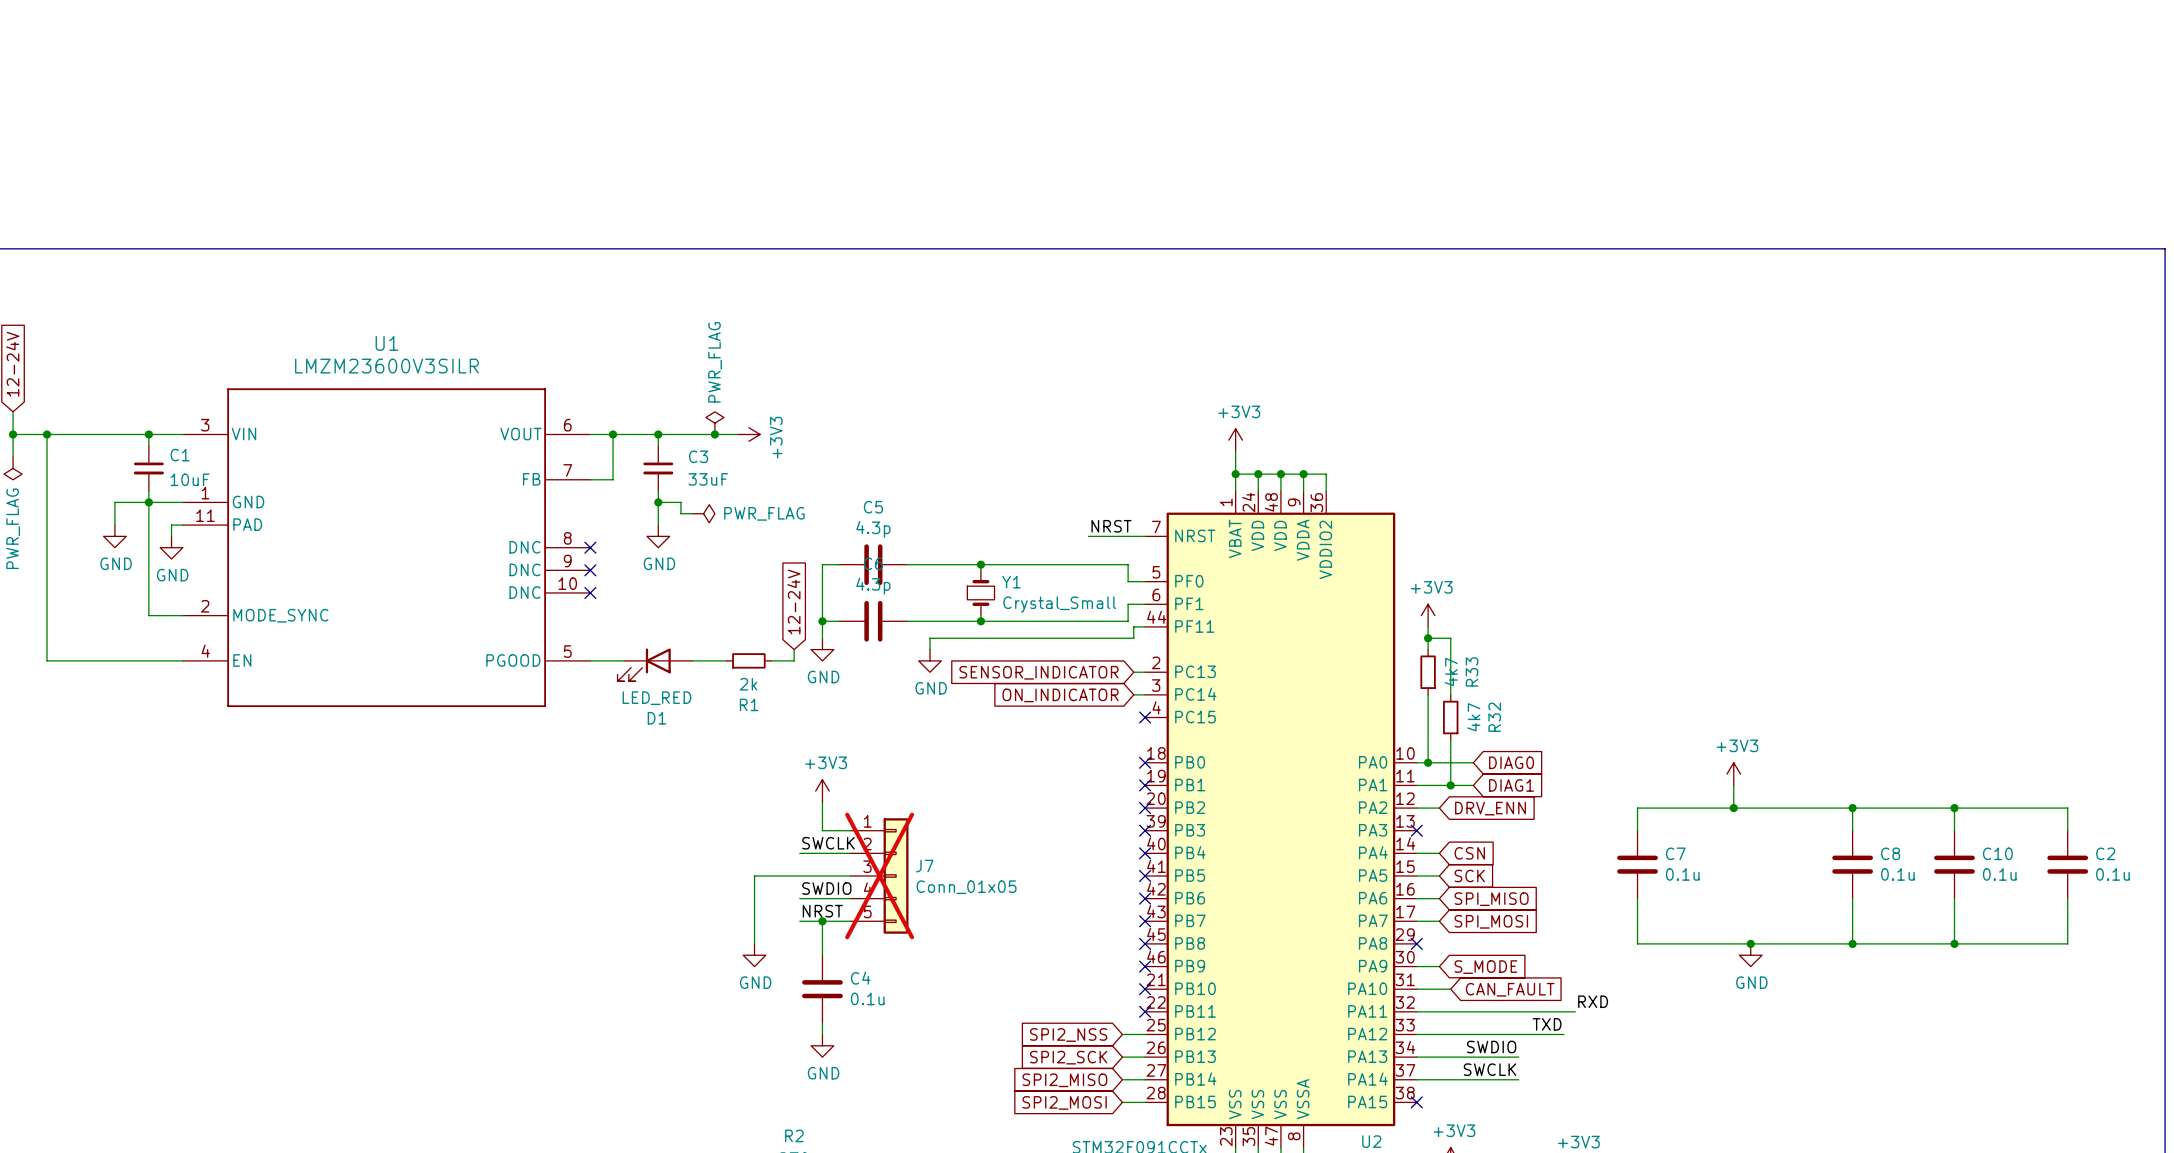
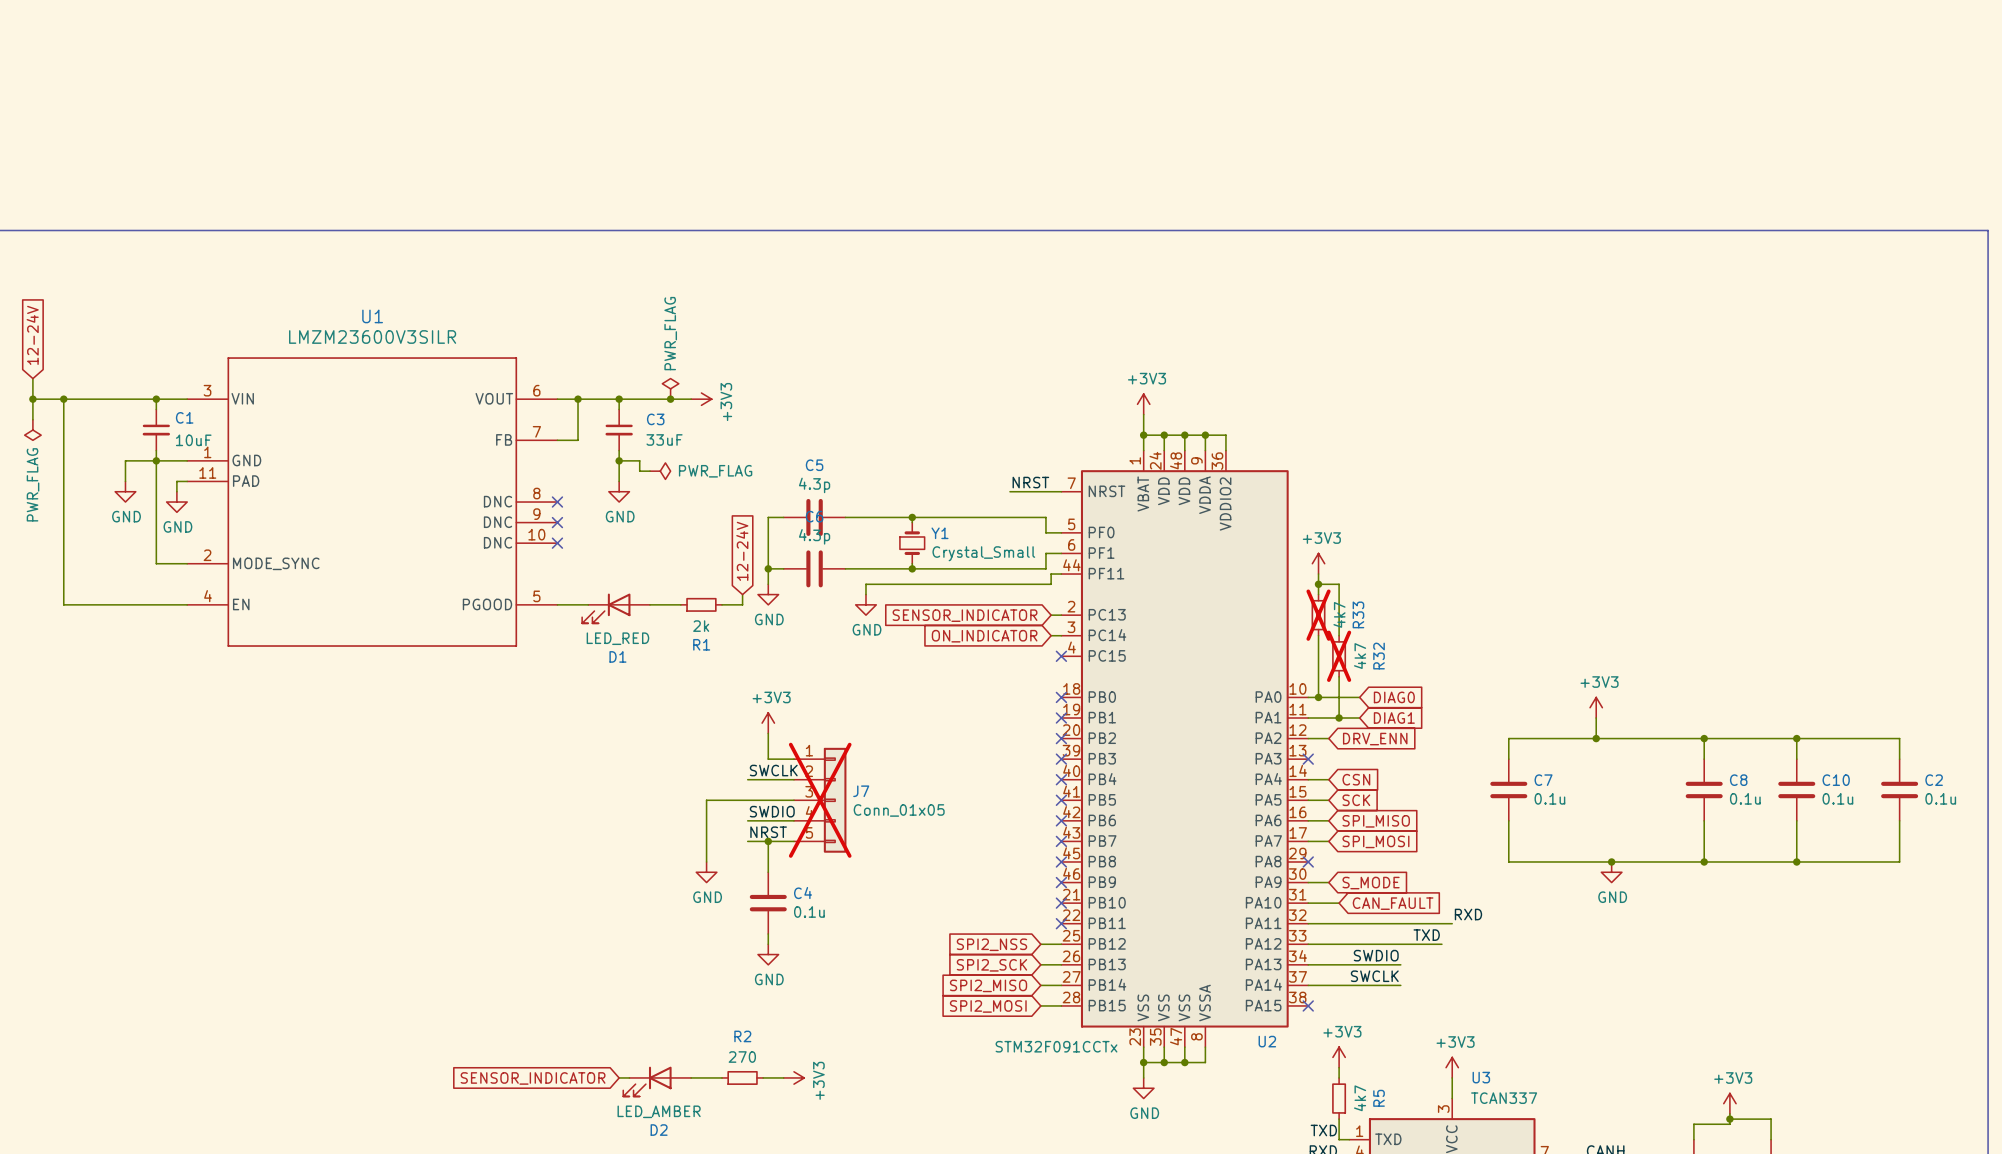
R33 do-not-place cross: none -> (1318, 615)
R32 do-not-place cross: none -> (1339, 656)

